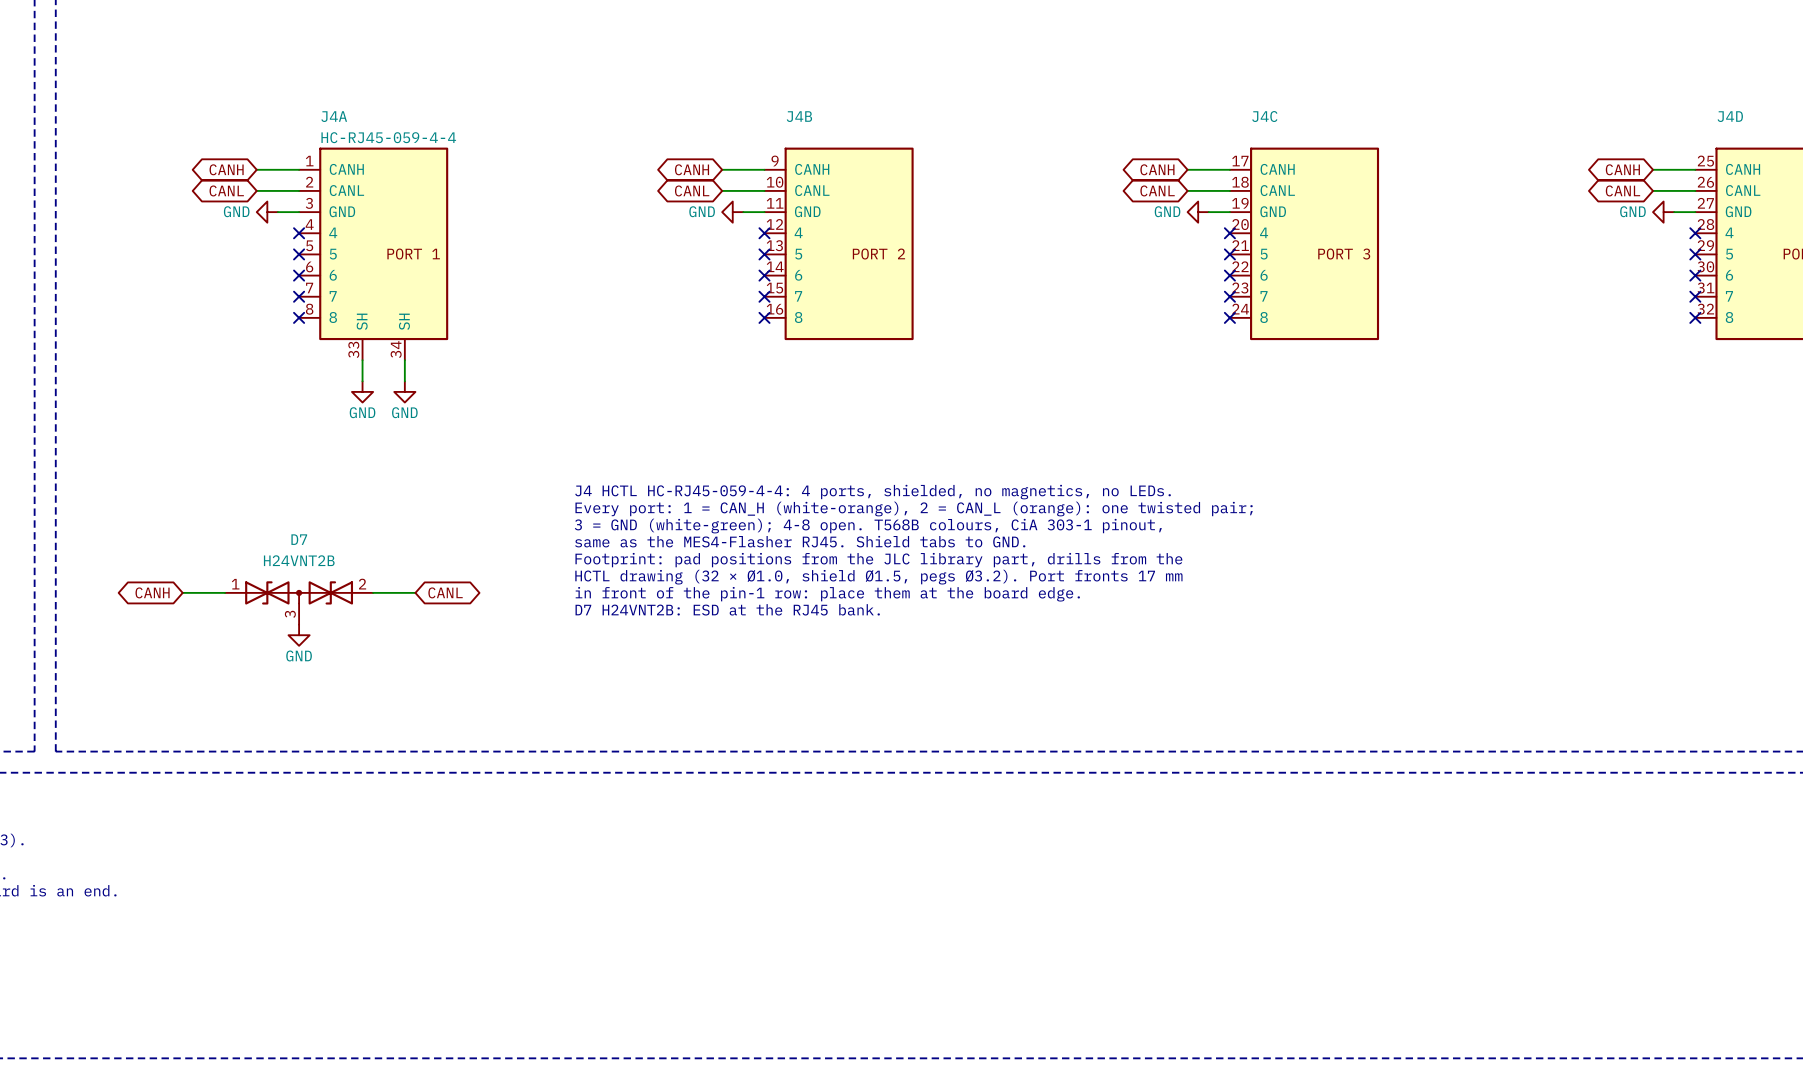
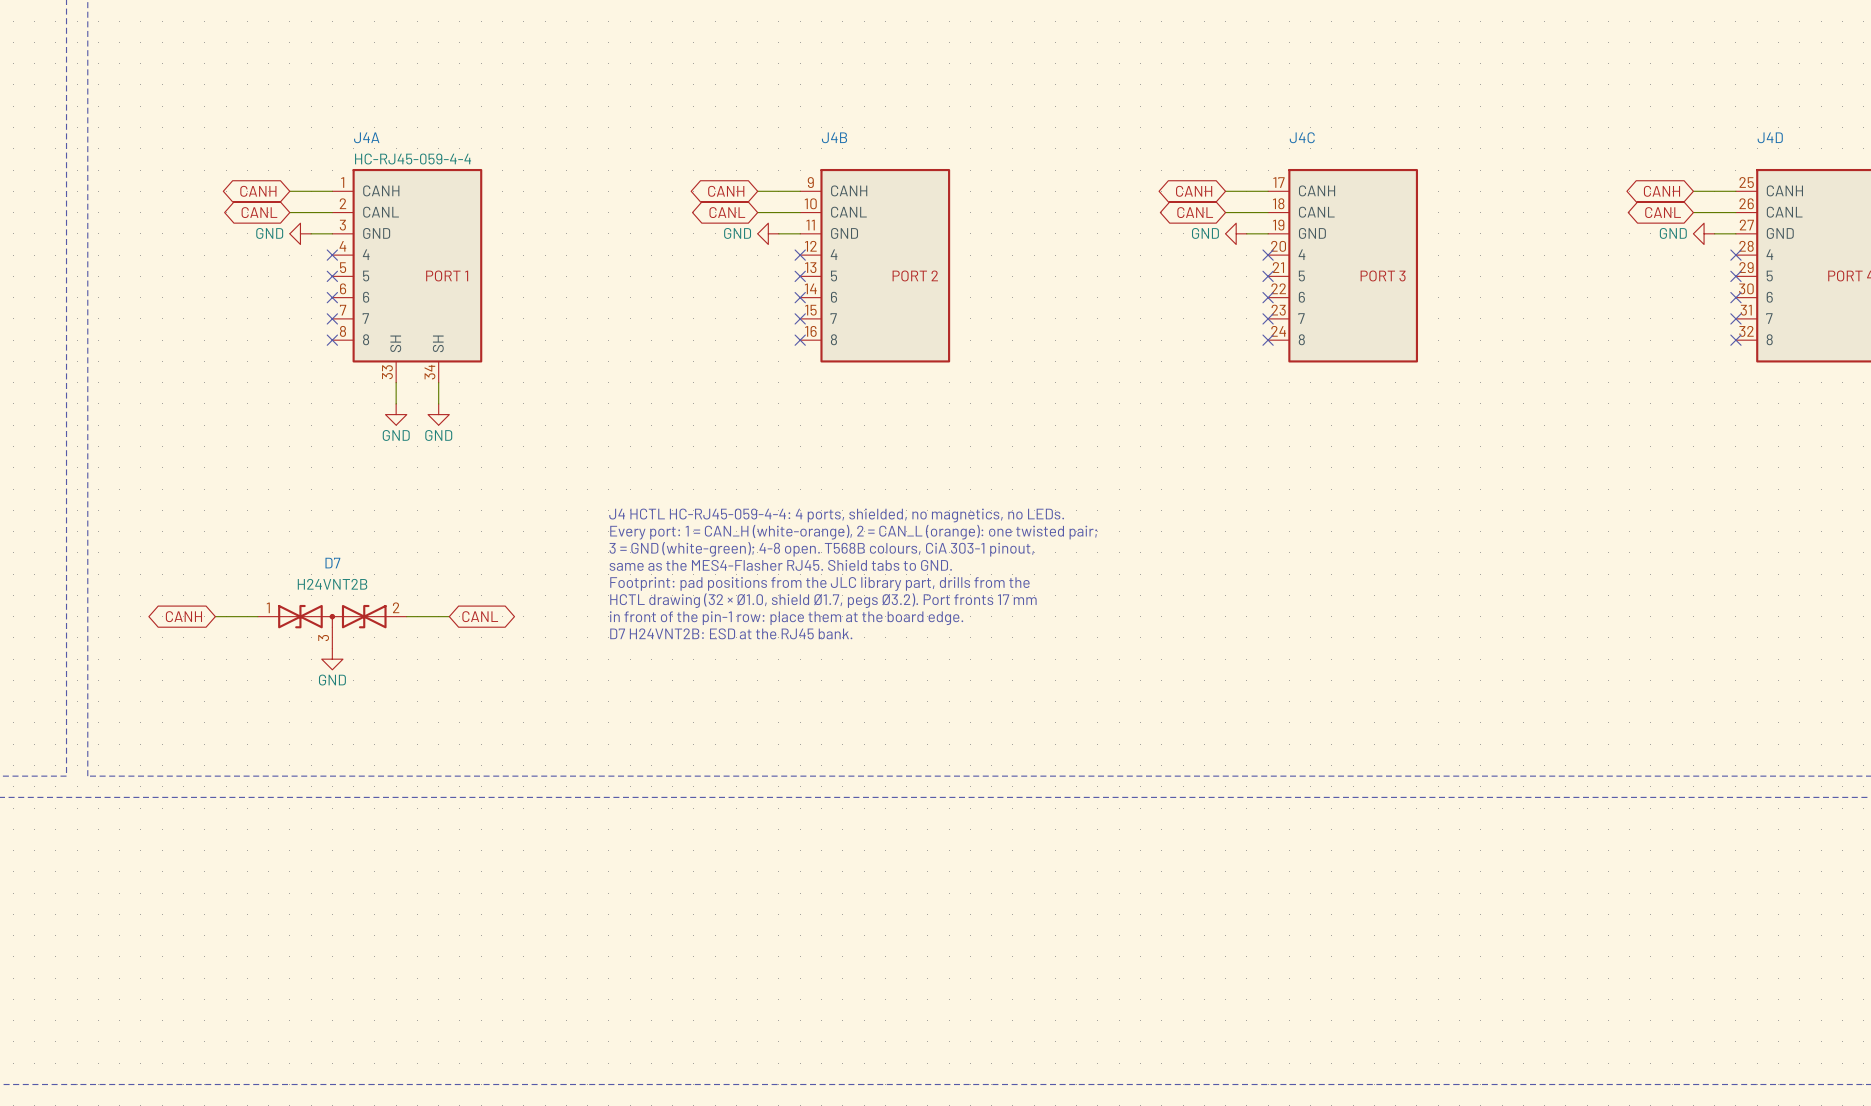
text: HCTL drawing (32 × Ø1.0, shield Ø1.5, pegs Ø3.2). Port fronts 17 mm (878, 577) -> HCTL drawing (32 × Ø1.0, shield Ø1.7, pegs Ø3.2). Port fronts 17 mm (823, 600)

